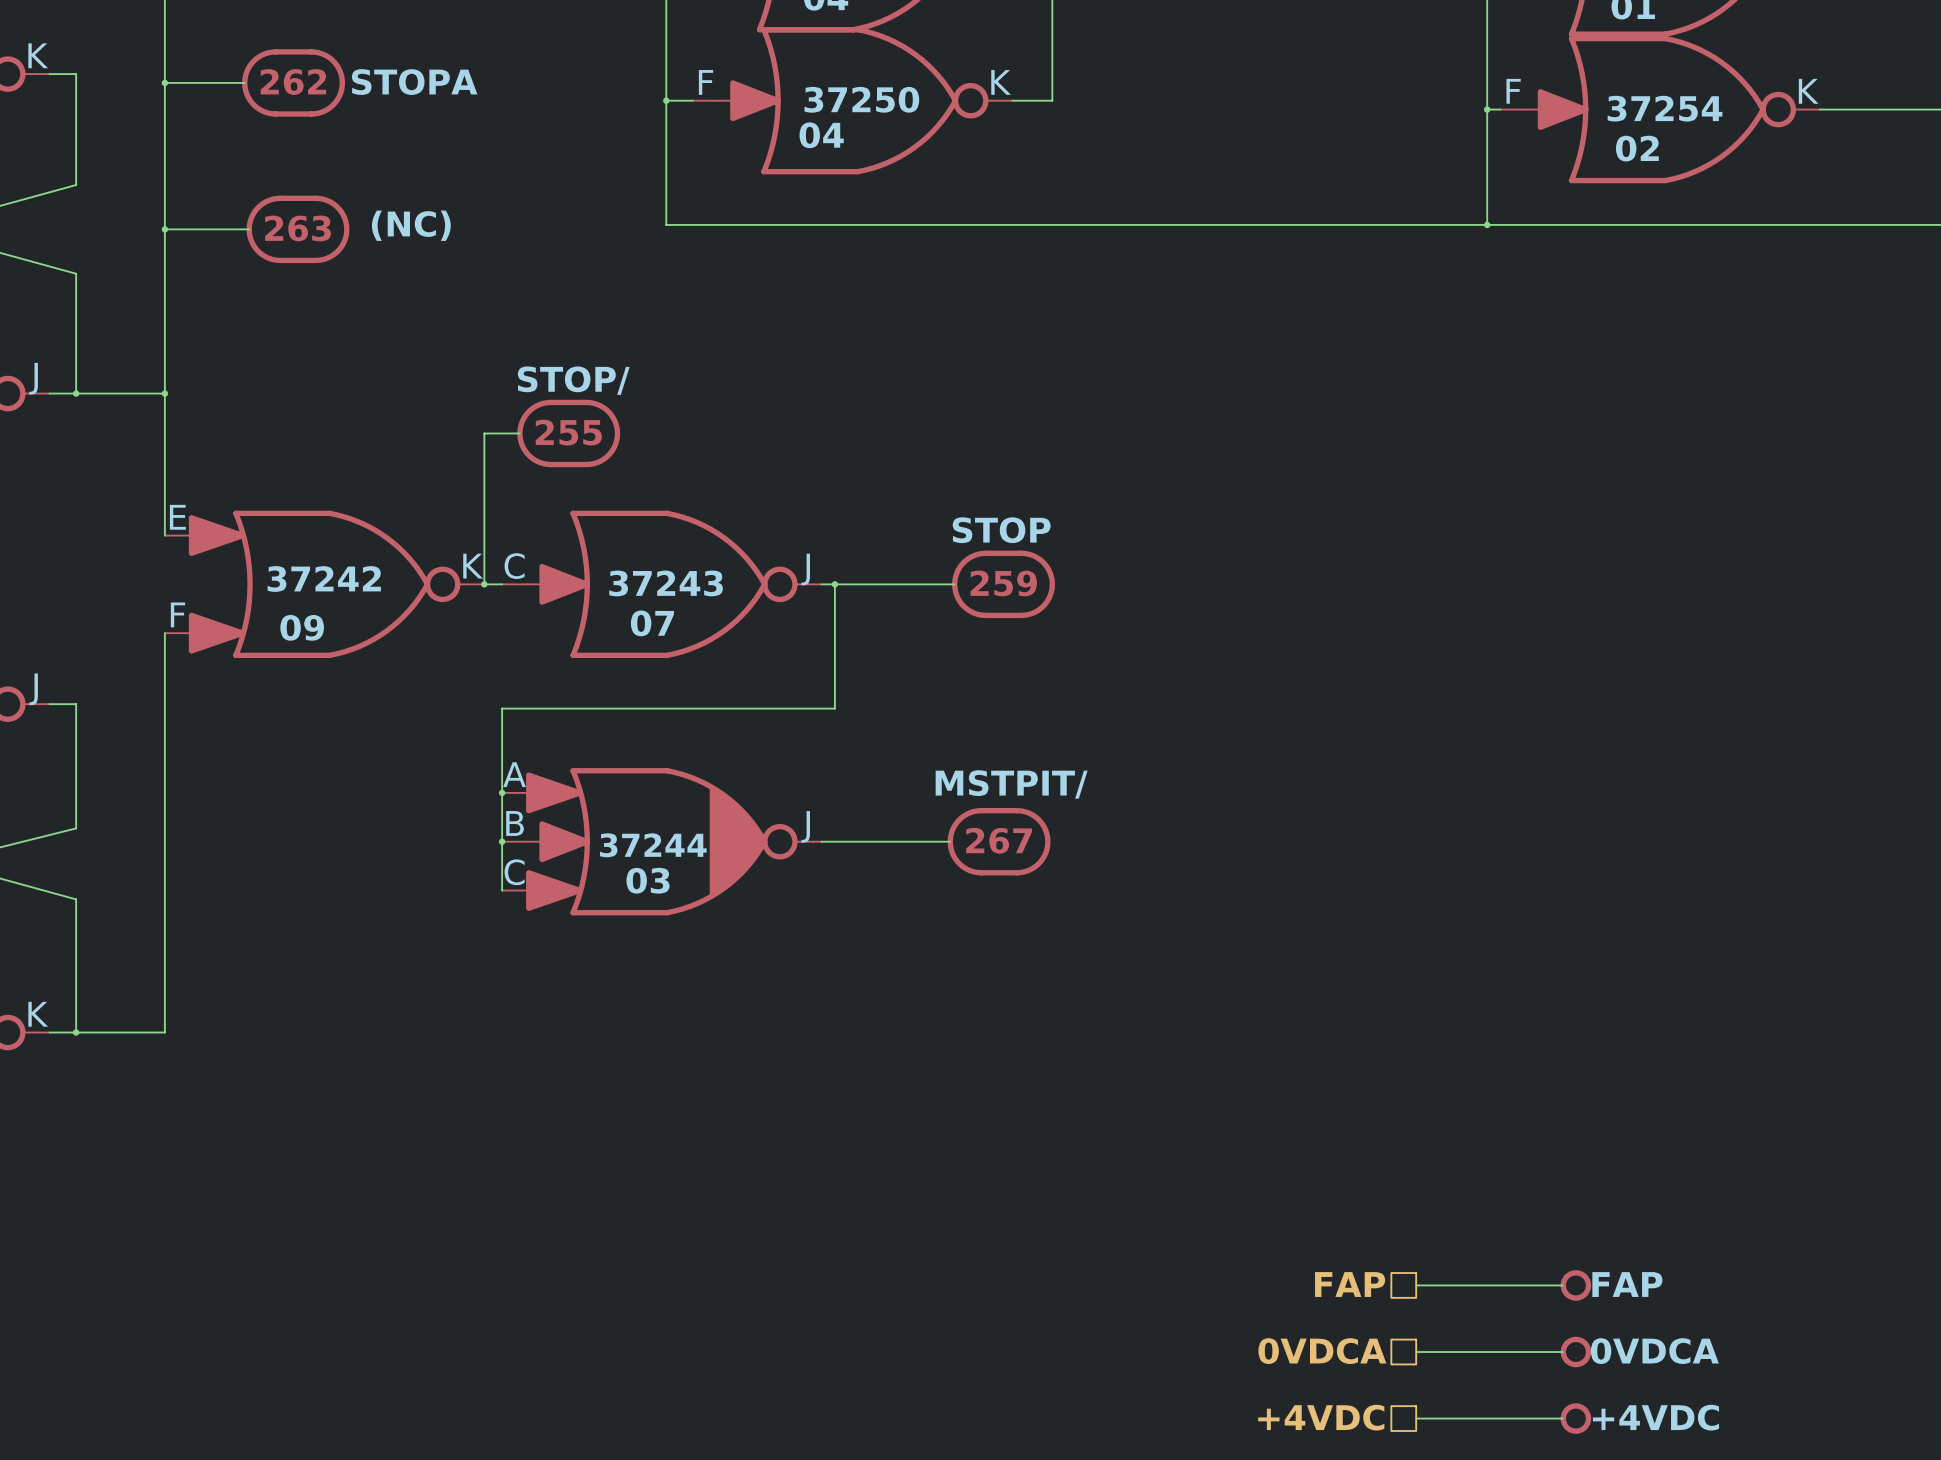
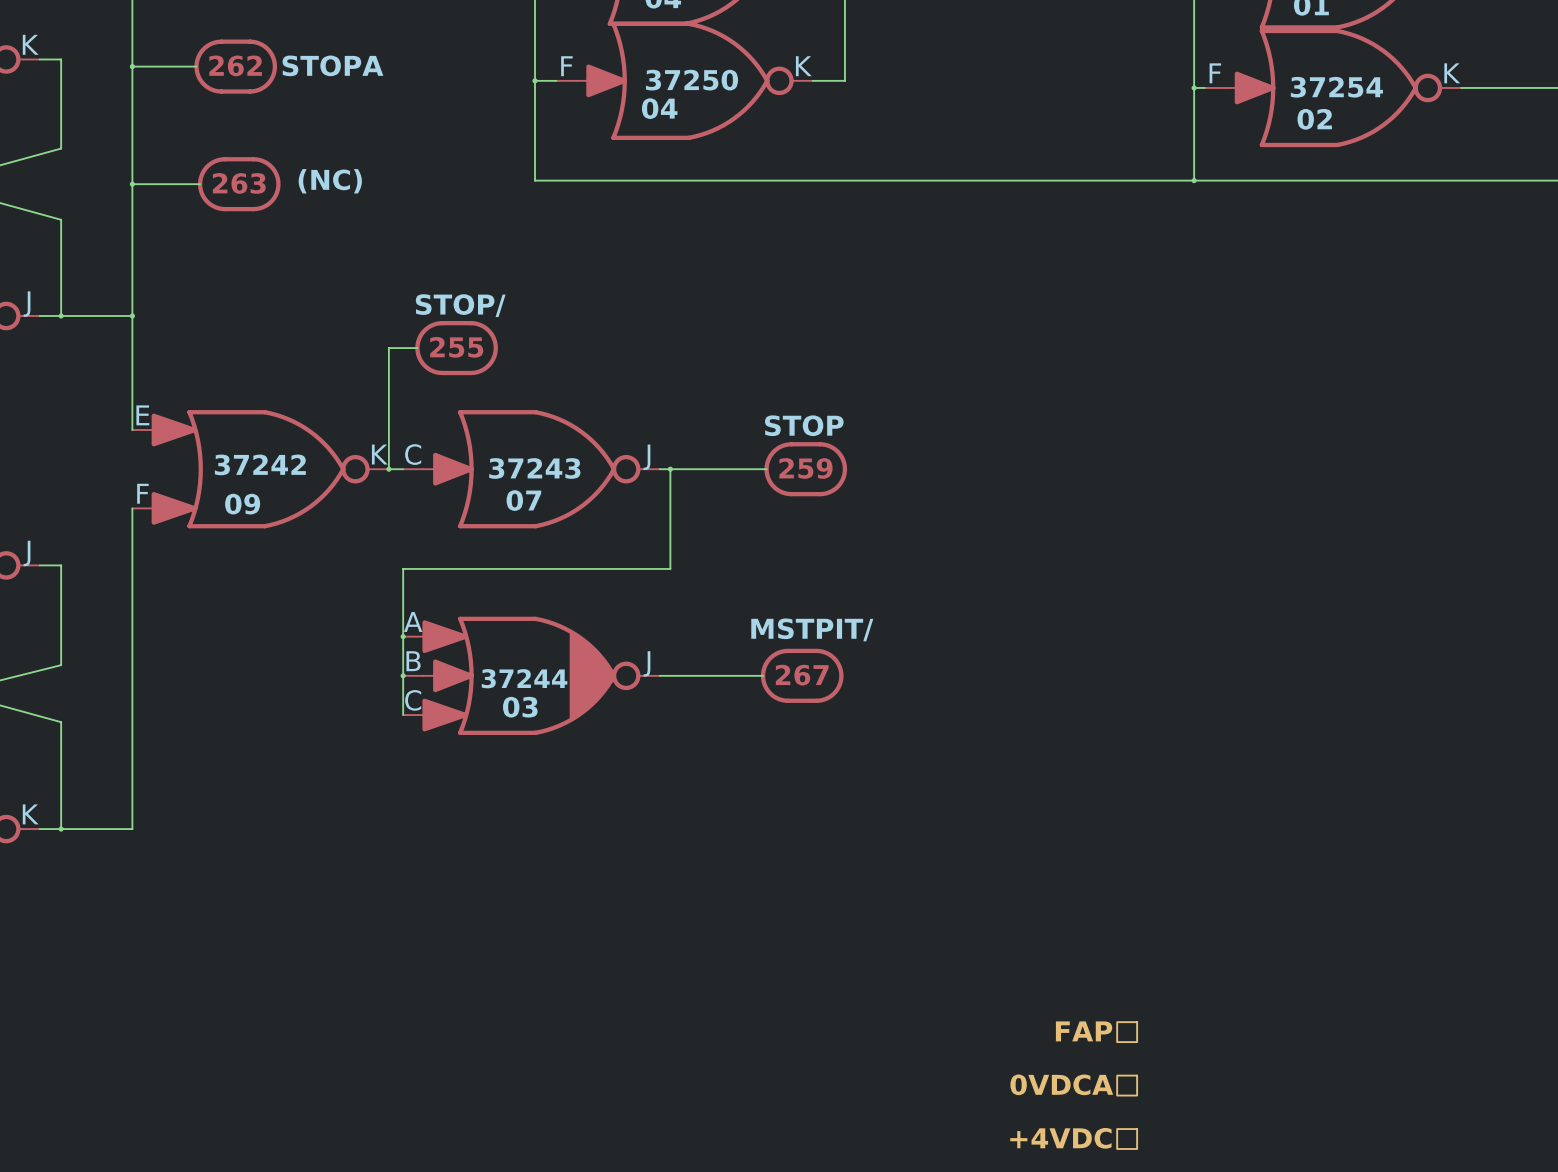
wire: (1416, 1285) (1562, 1285) -> none
part: (1575, 1285) -> none
wire: (1416, 1352) (1562, 1352) -> none
part: (1575, 1352) -> none
wire: (1416, 1418) (1562, 1418) -> none
part: (1575, 1418) -> none

